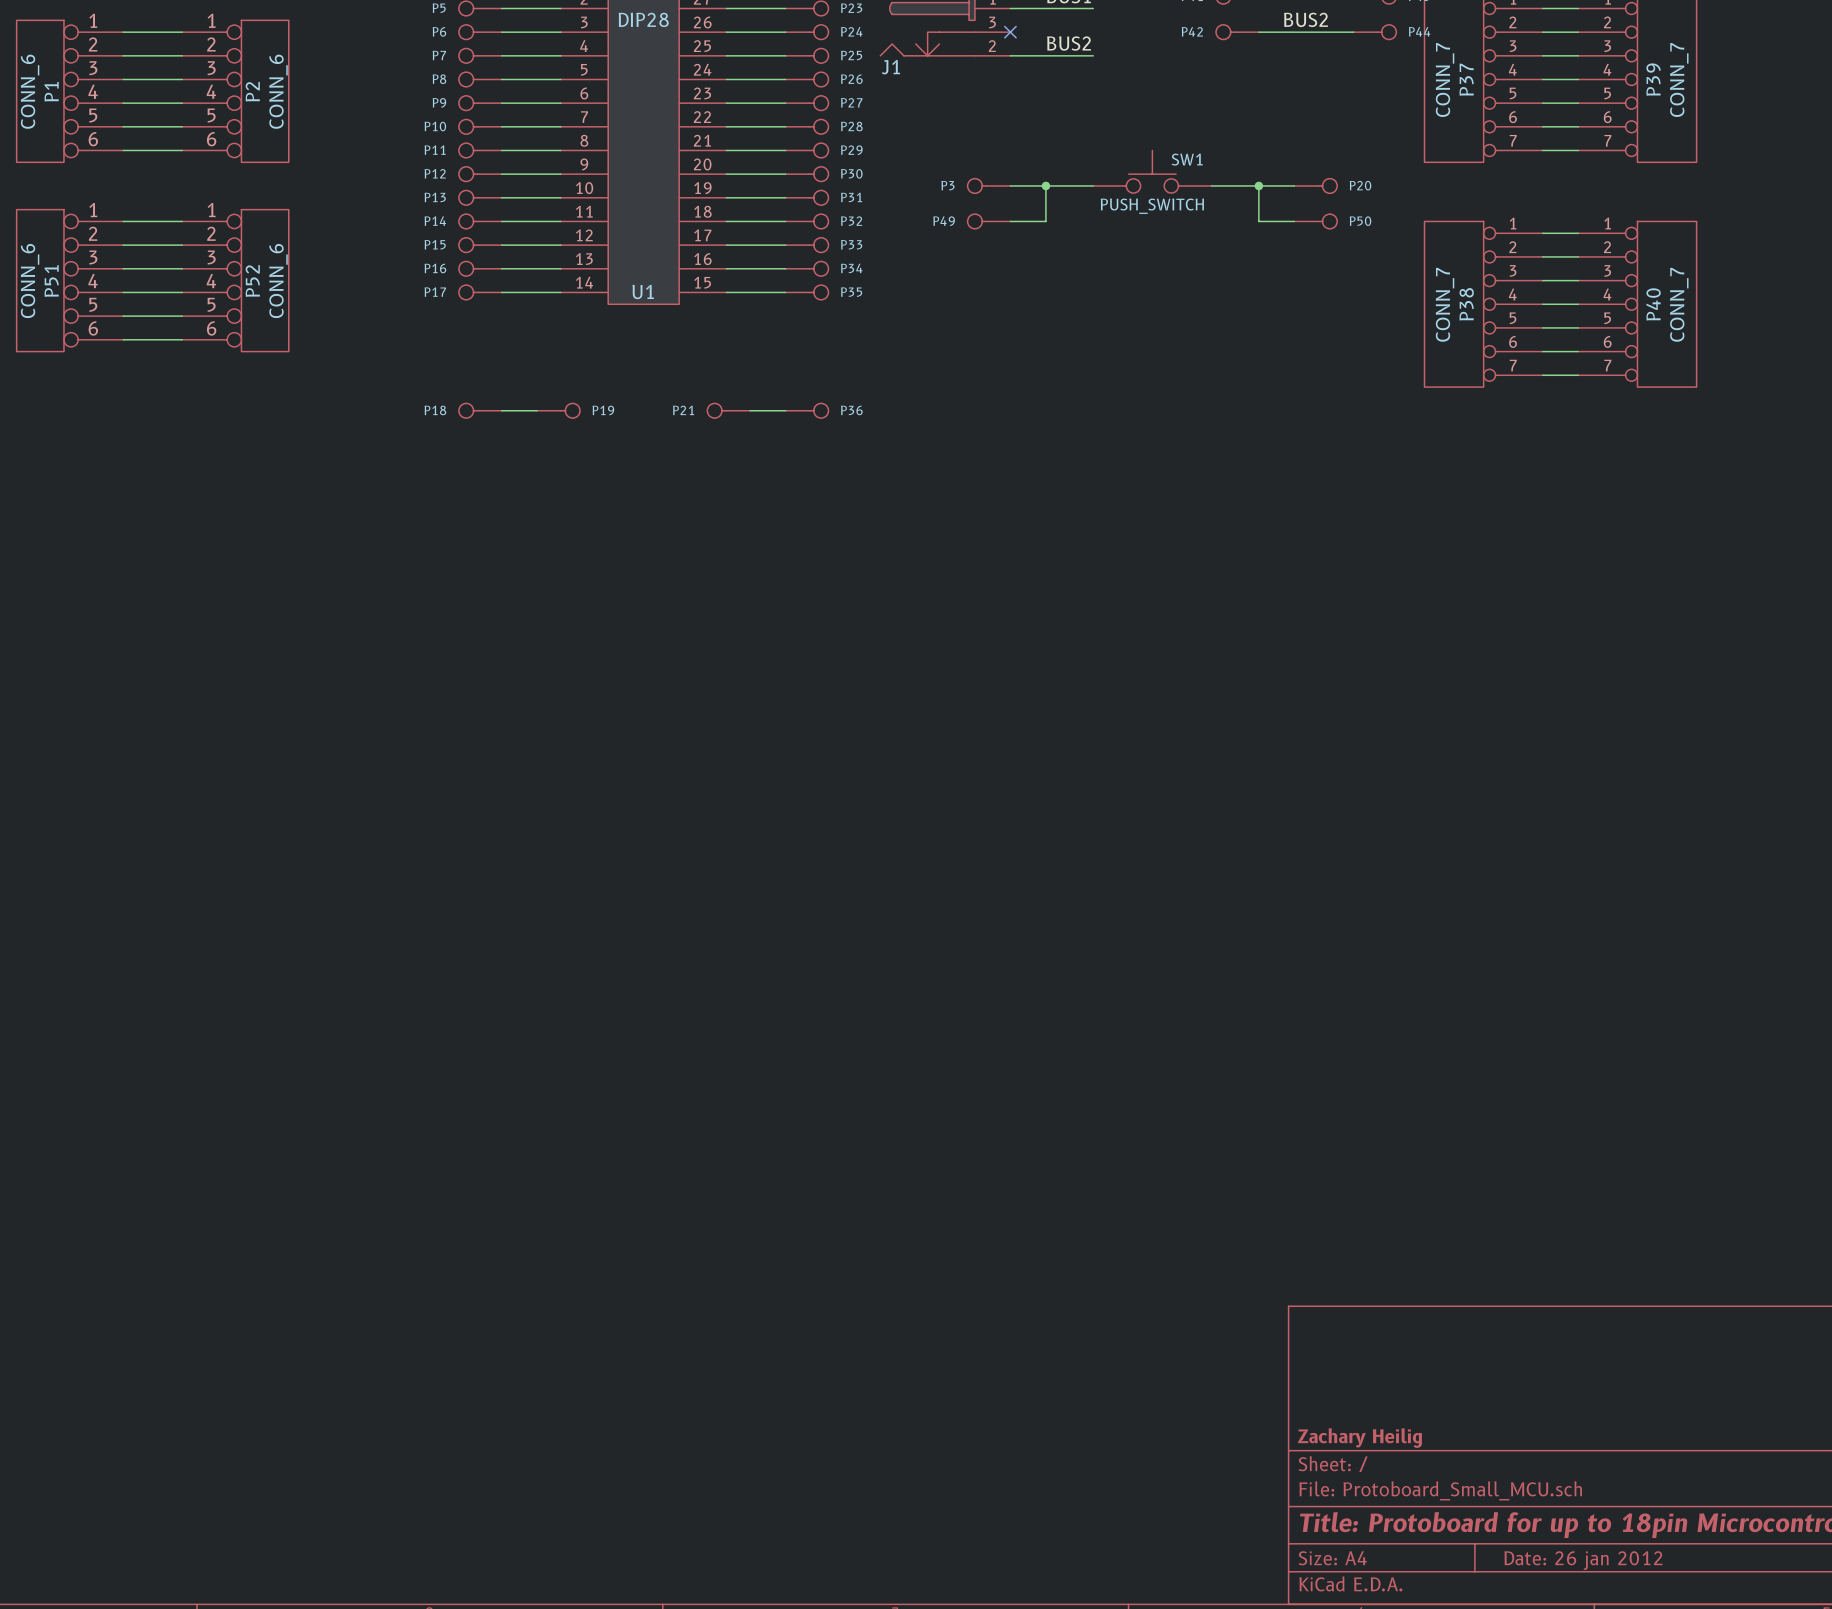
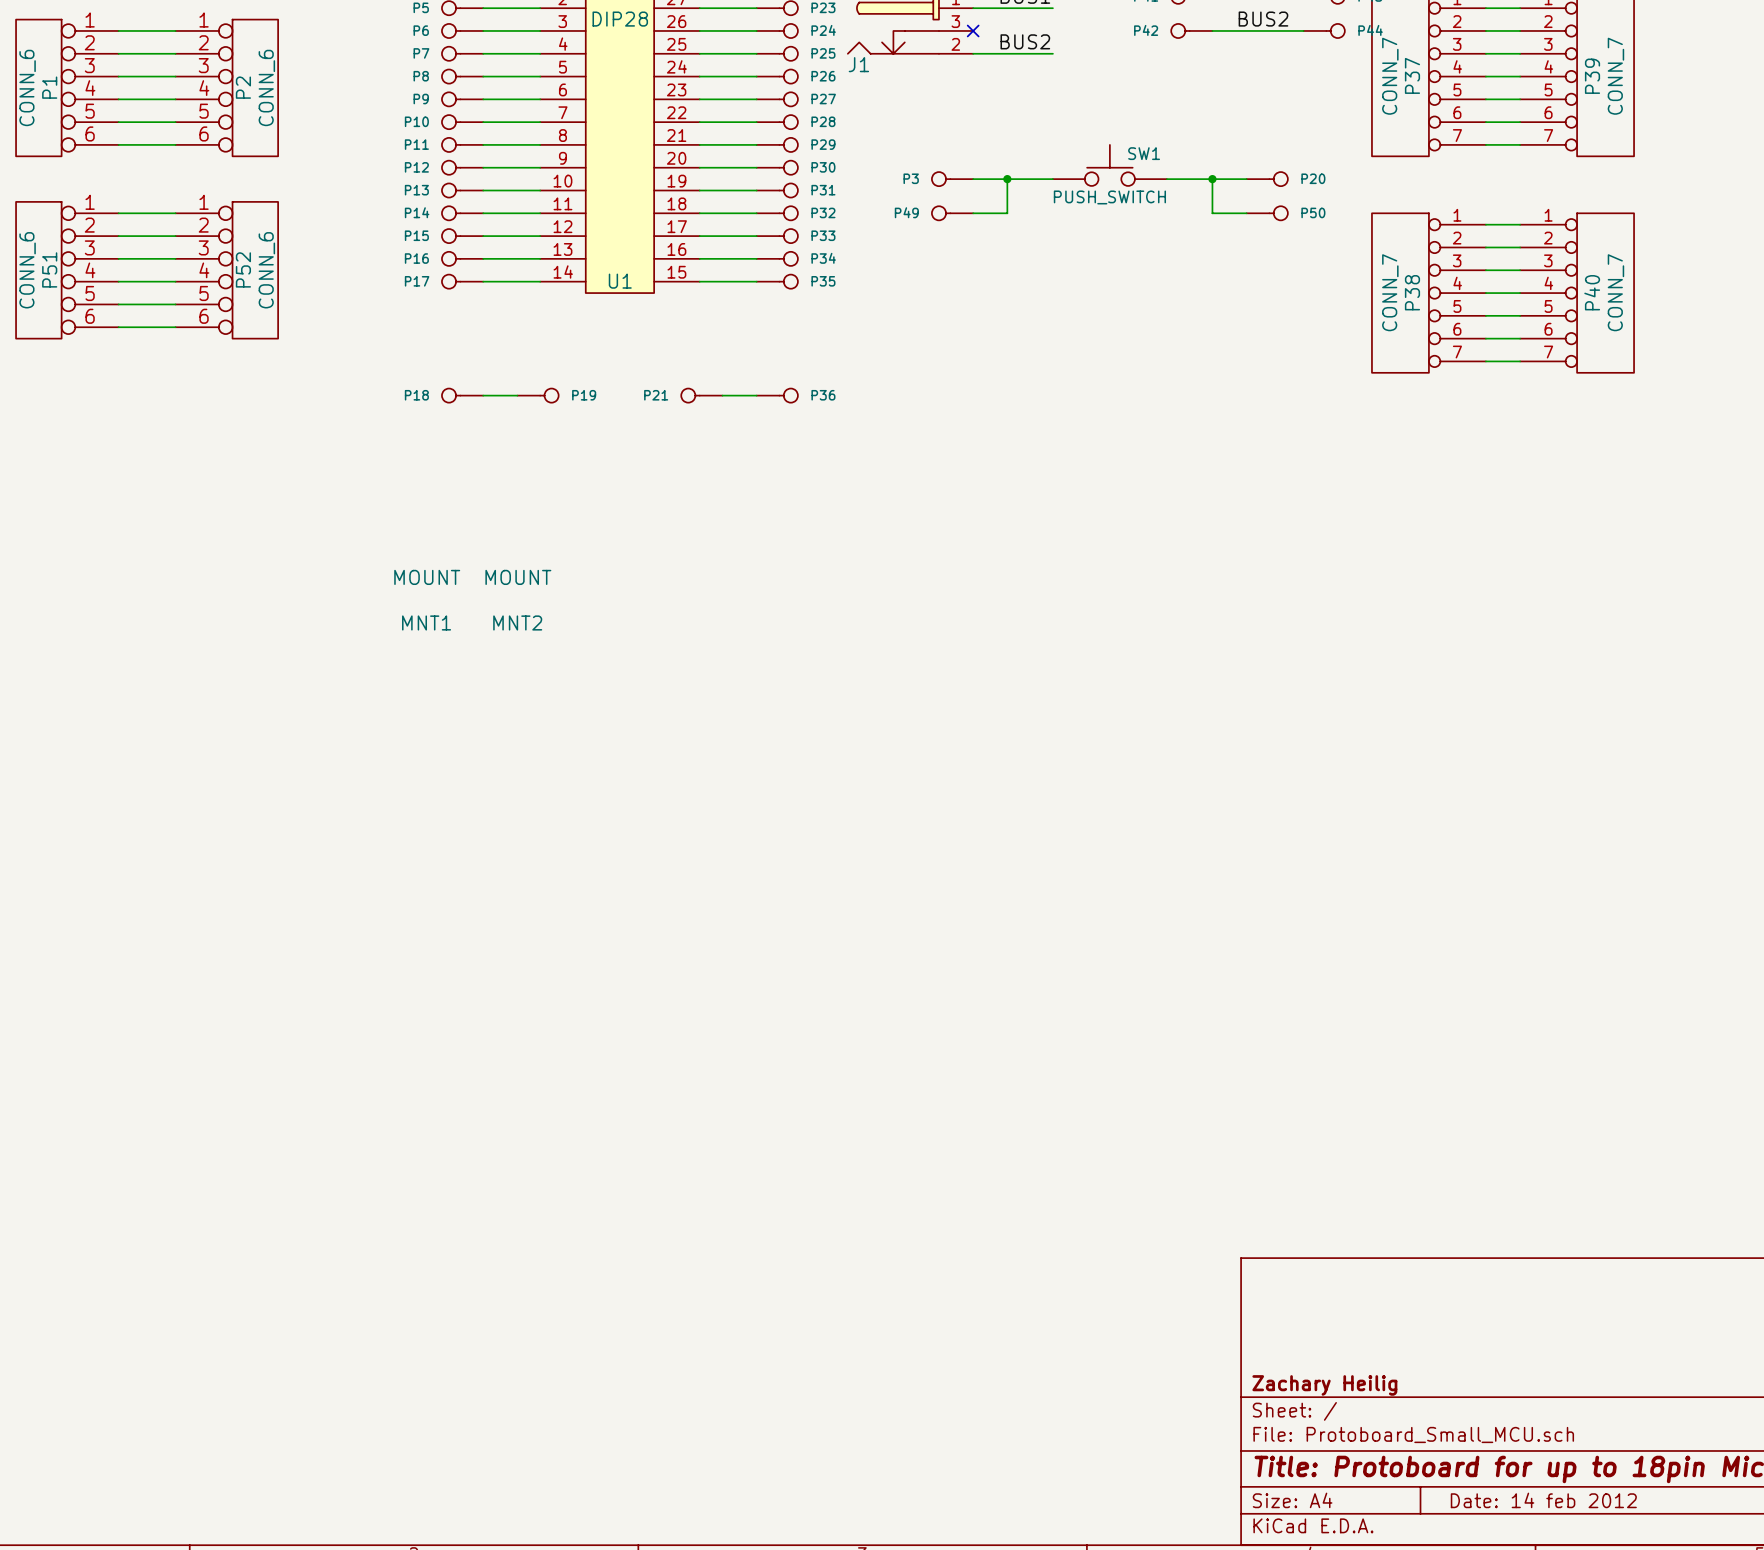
MNT1: none -> MOUNT (427, 600)
MNT2: none -> MOUNT (518, 600)
title block: Date: 26 jan 2012 (1583, 1560) -> Date: 14 feb 2012 (1543, 1500)

